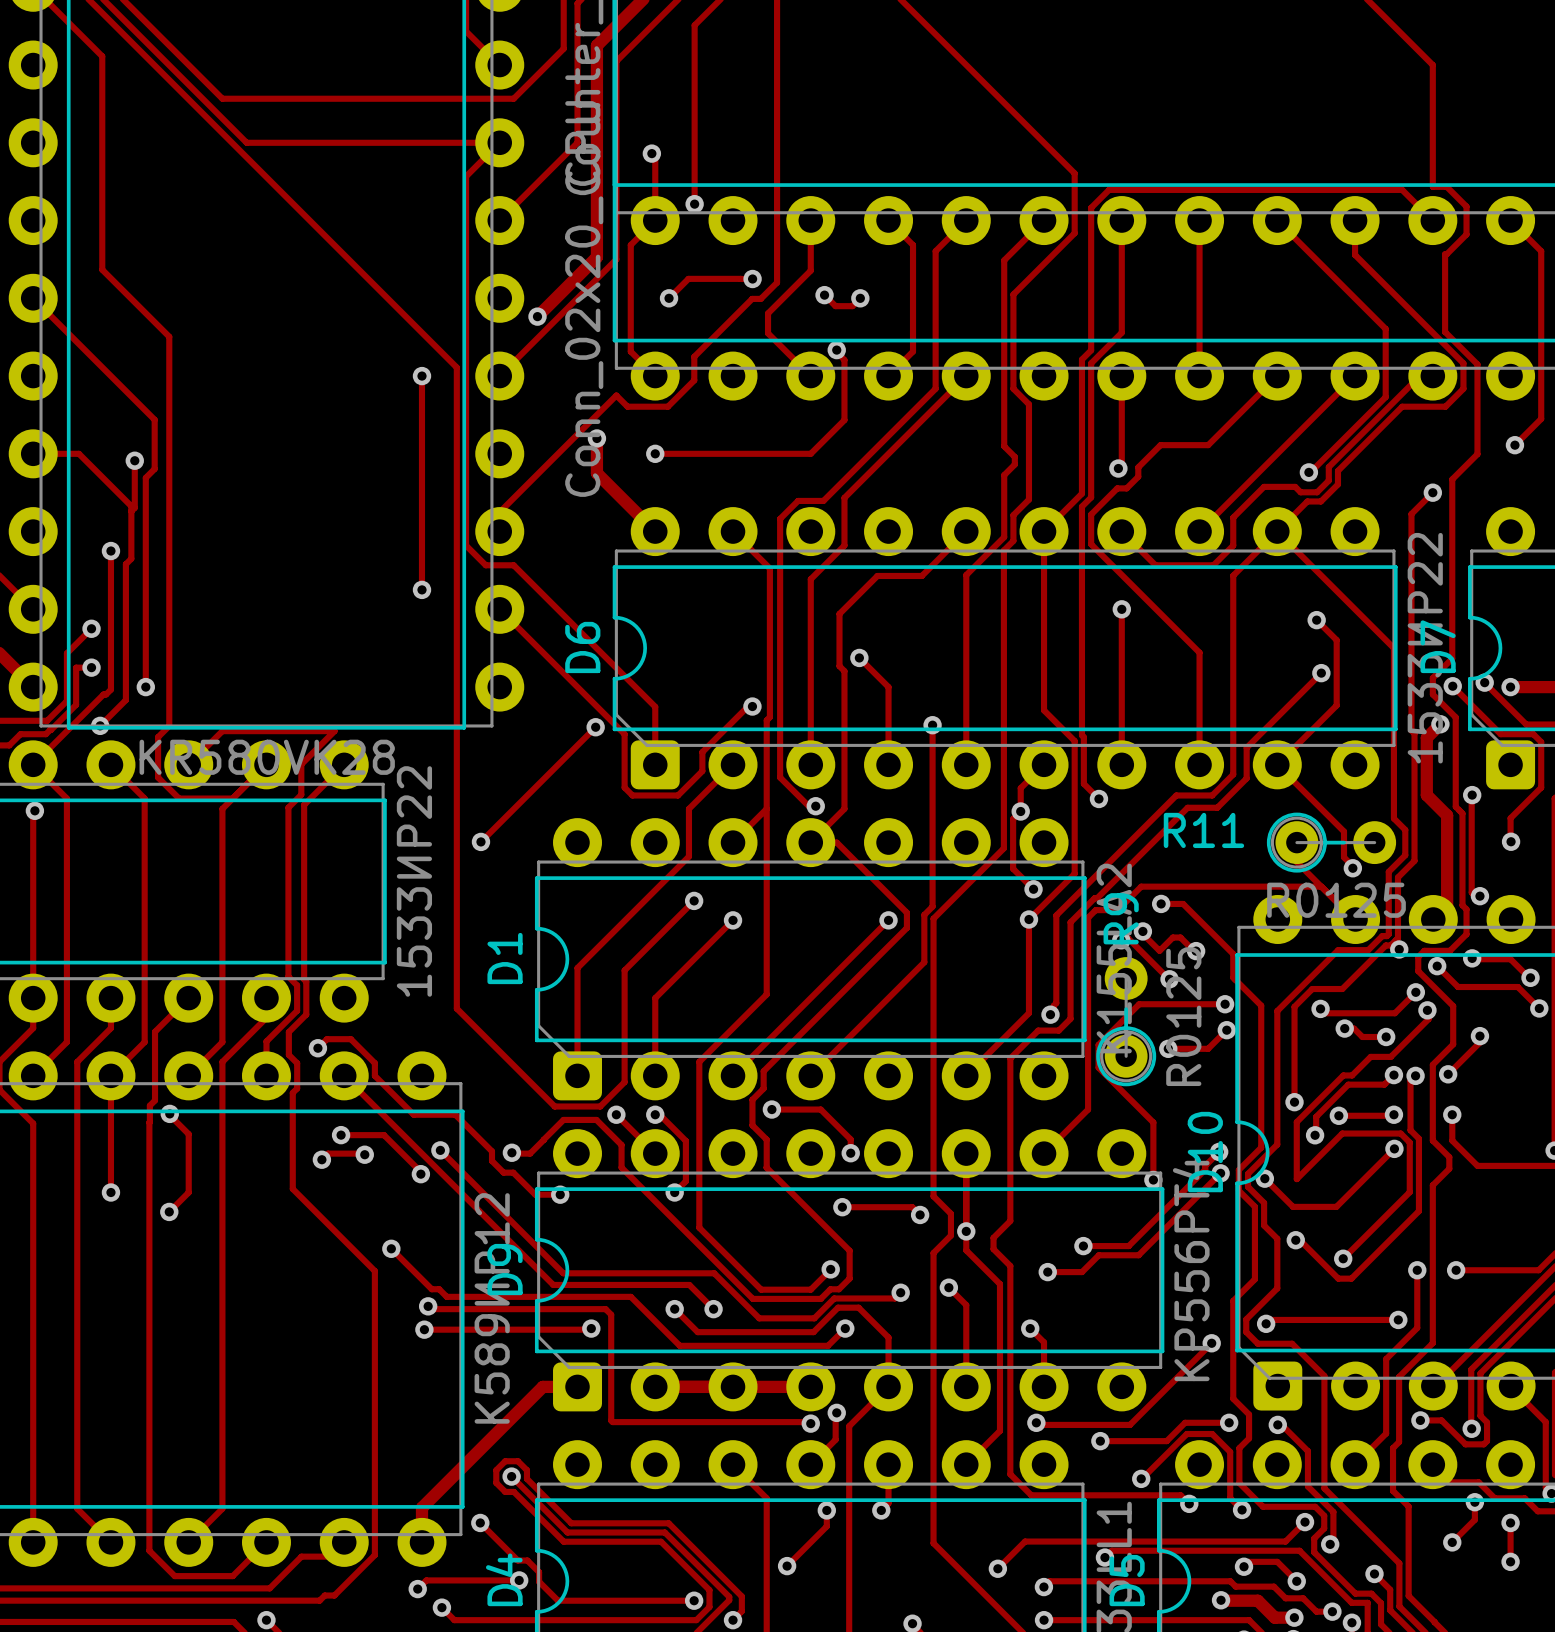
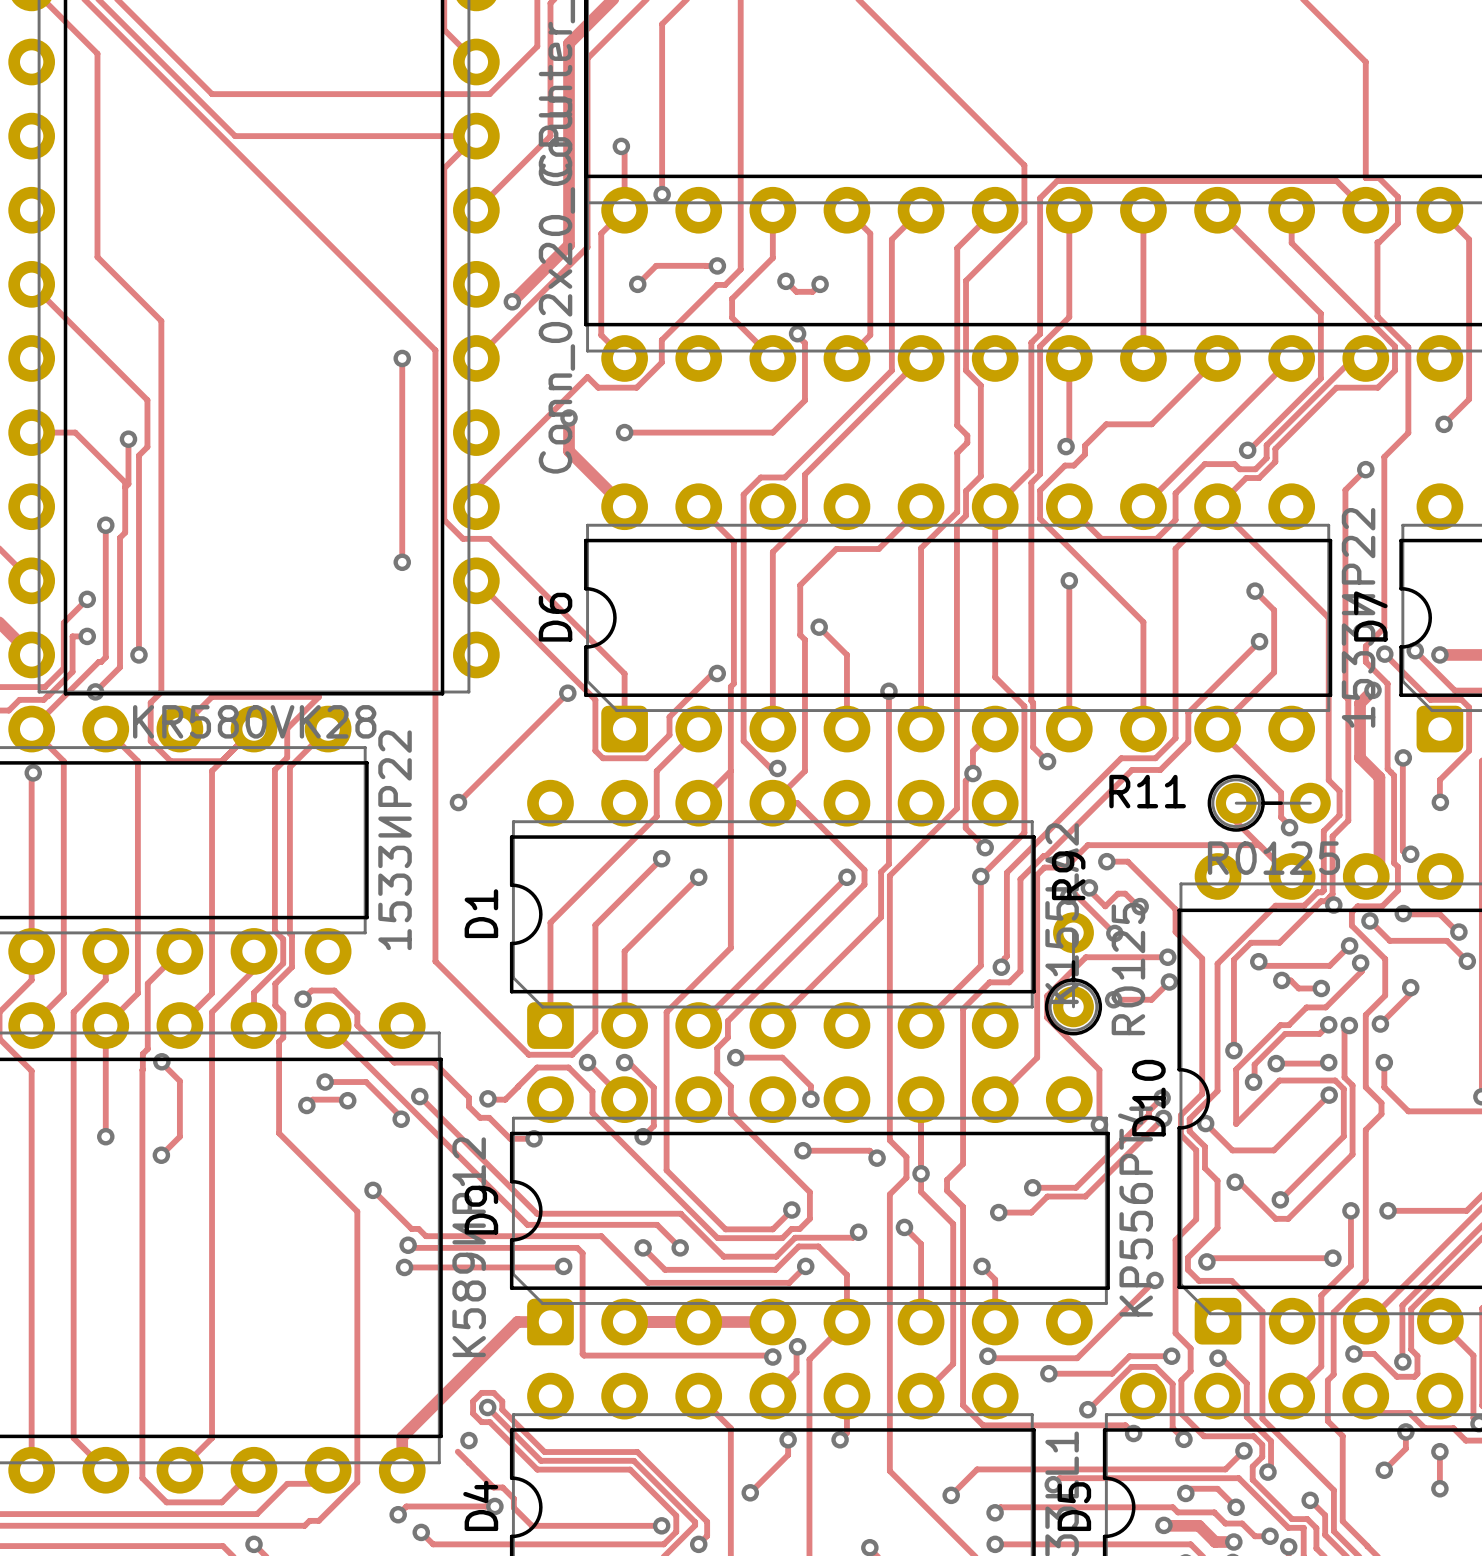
via position: (480, 1522) -> (468, 1440)

